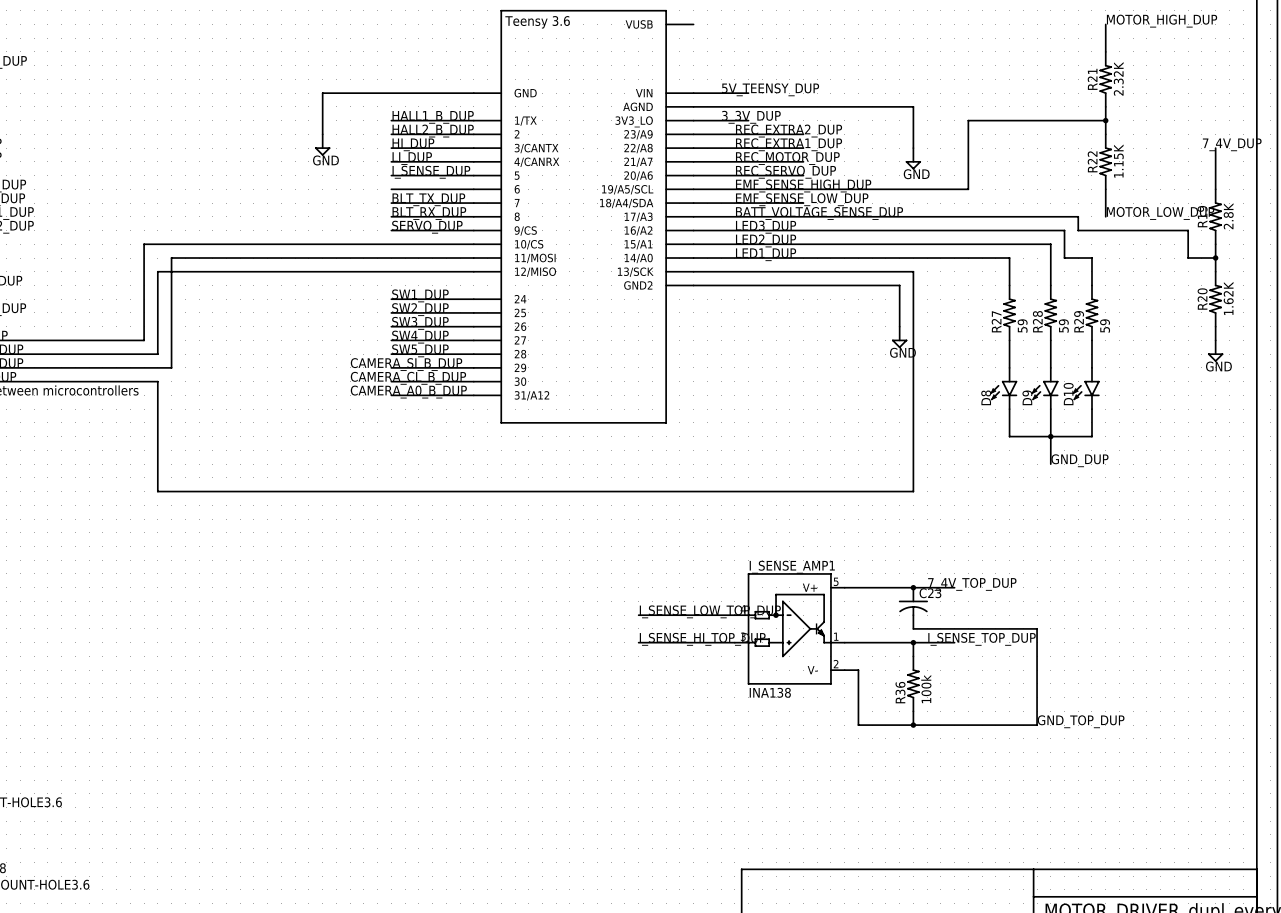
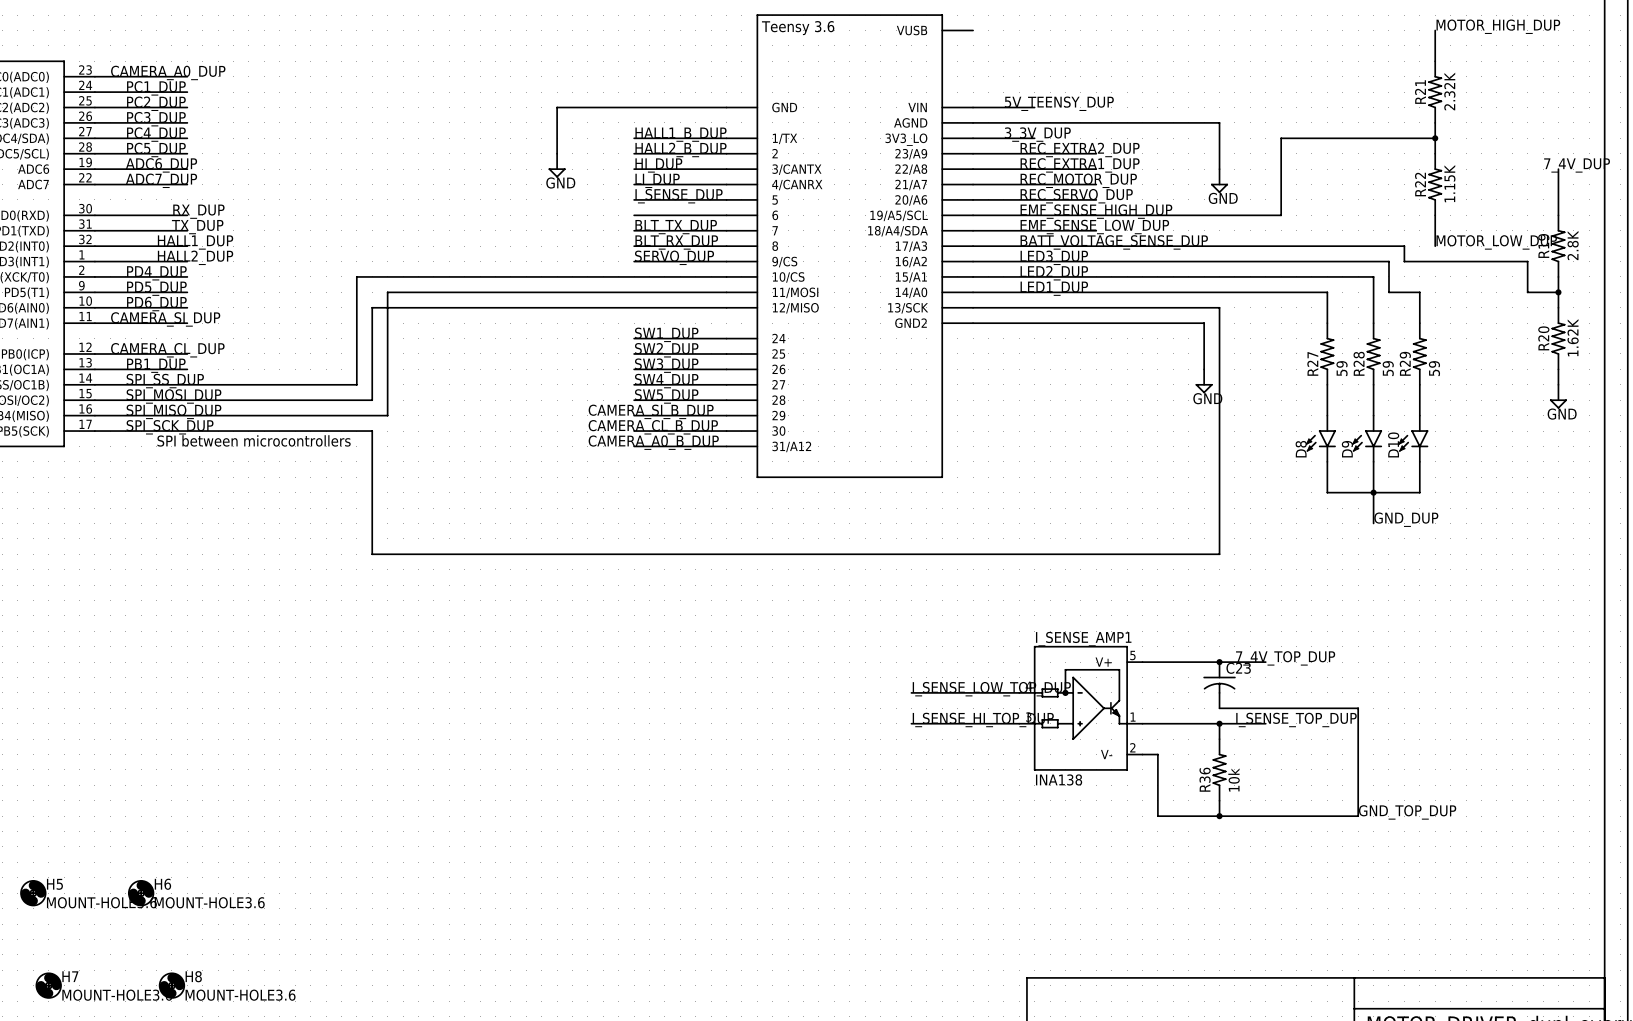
R36 value: 100k (926, 689) -> 10k (1234, 780)

